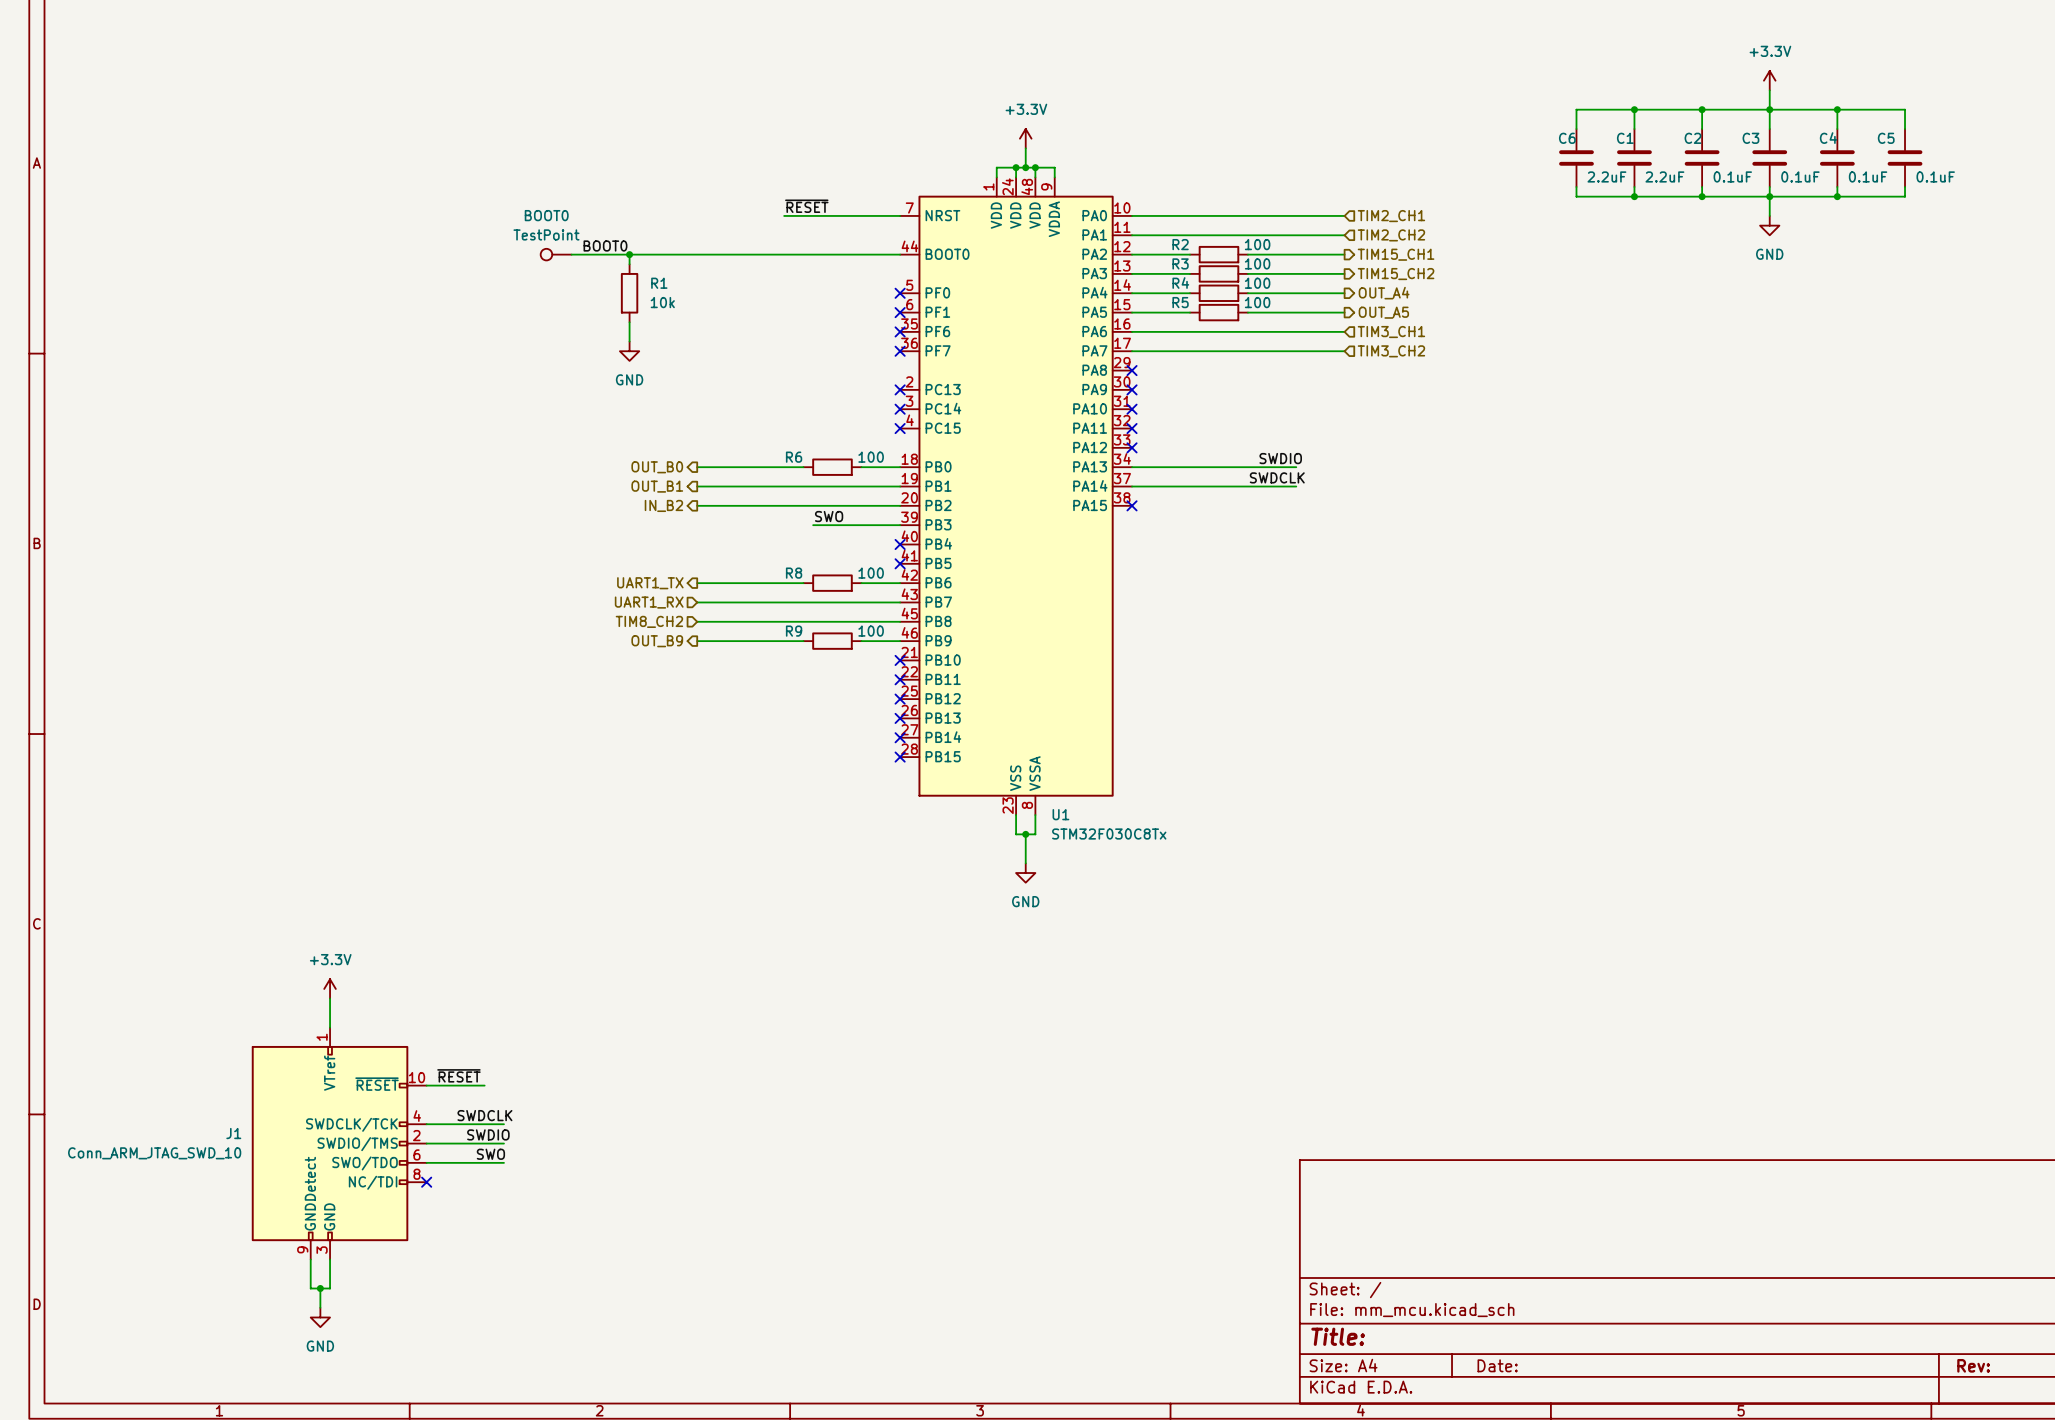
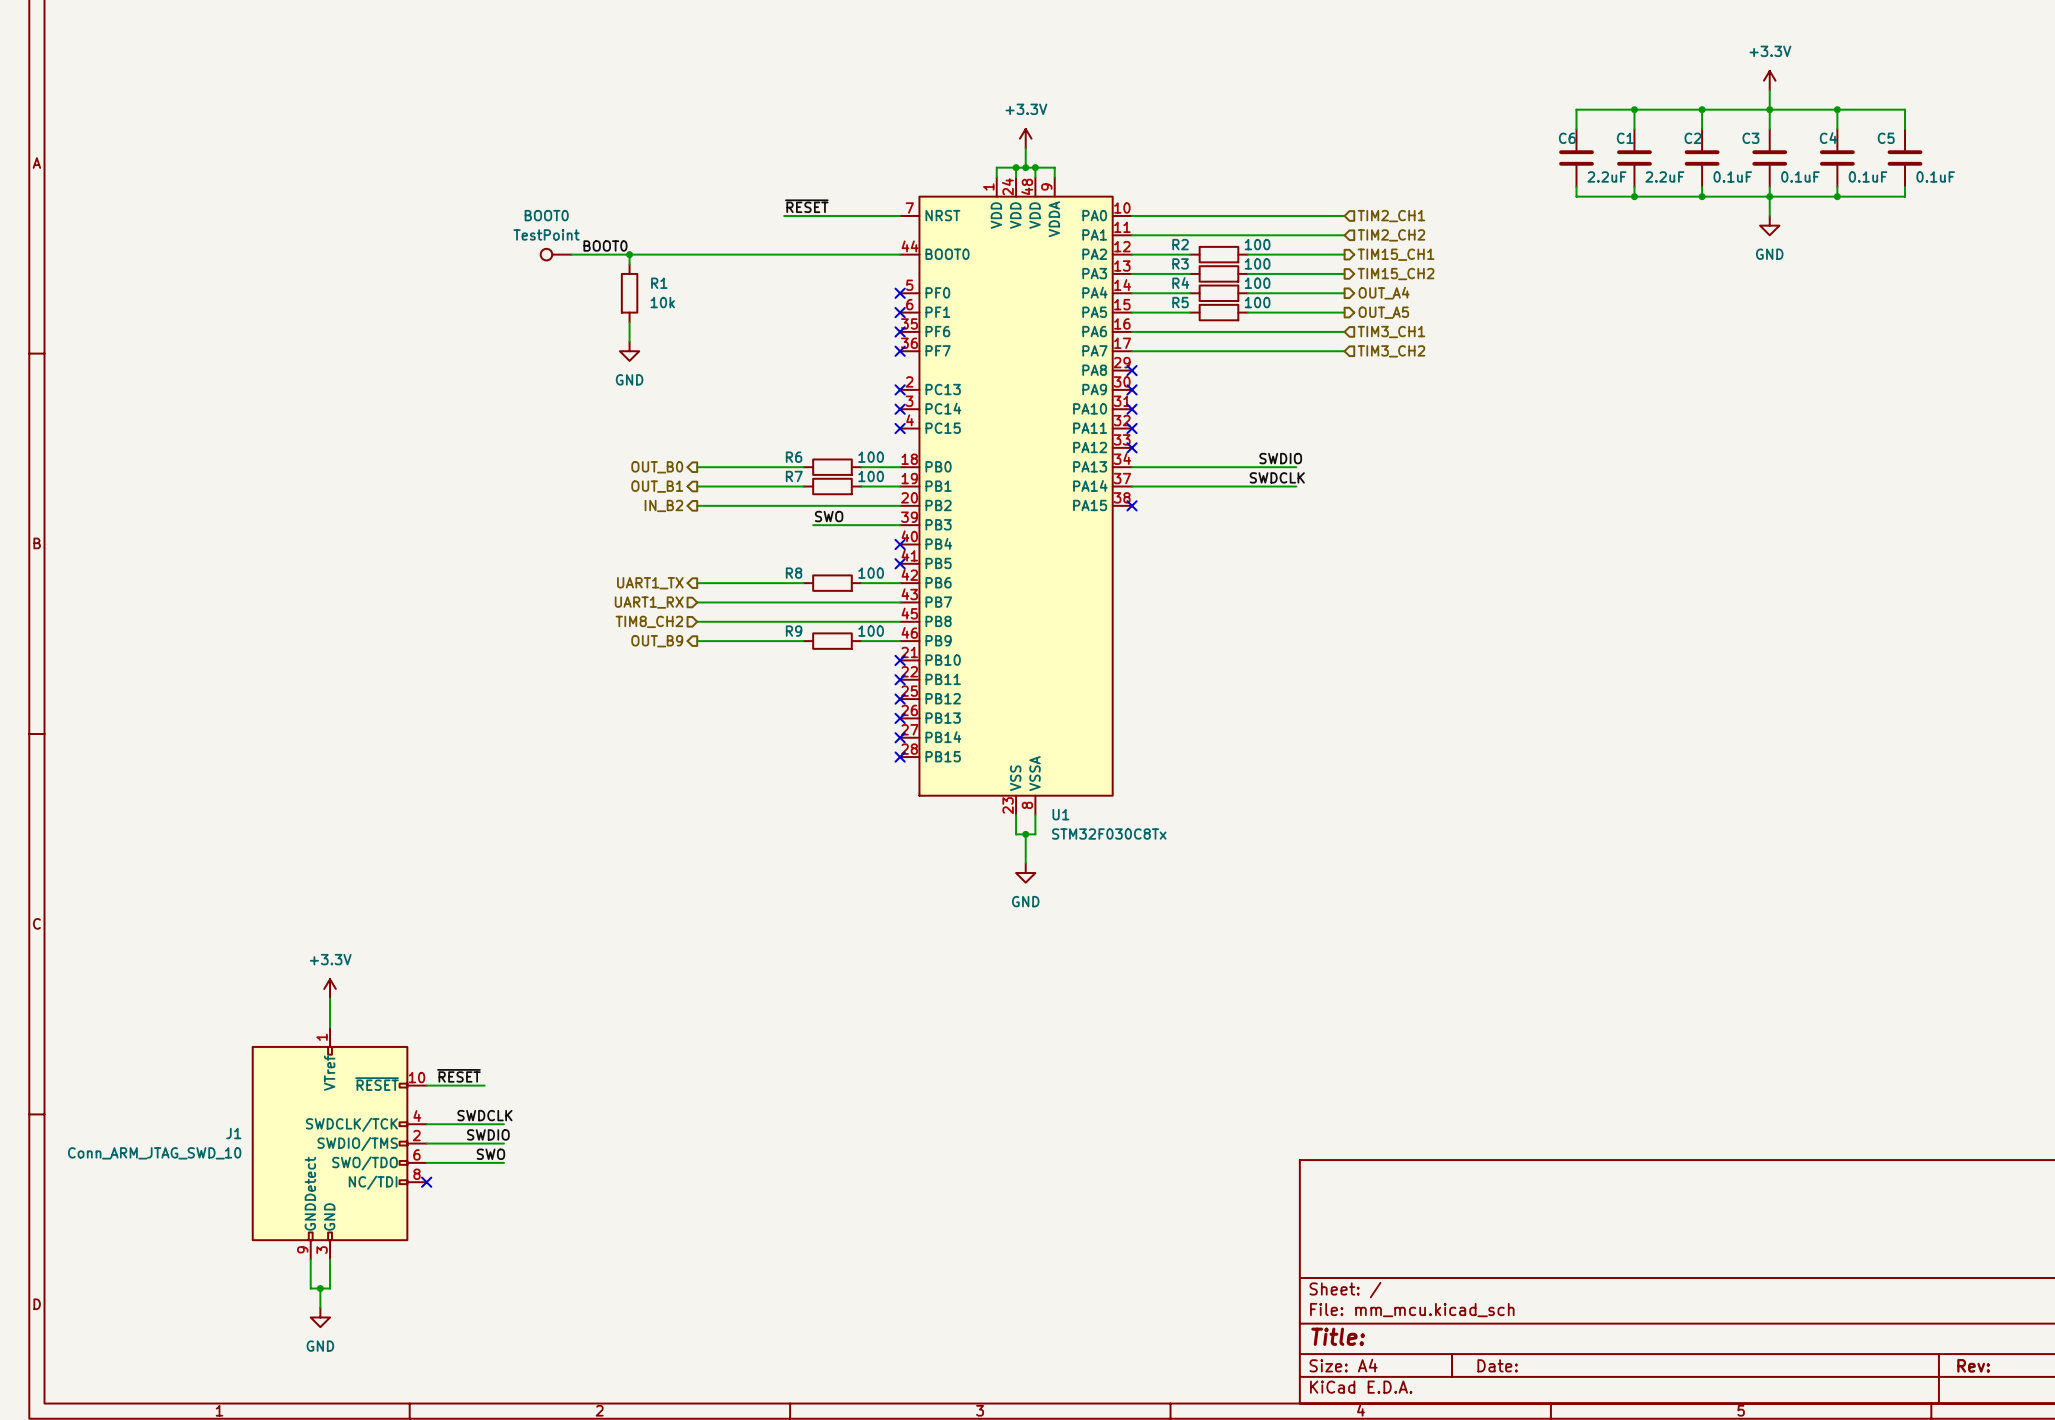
wire: (803, 486) (861, 486) -> none
R7: none -> 100 (832, 486)

